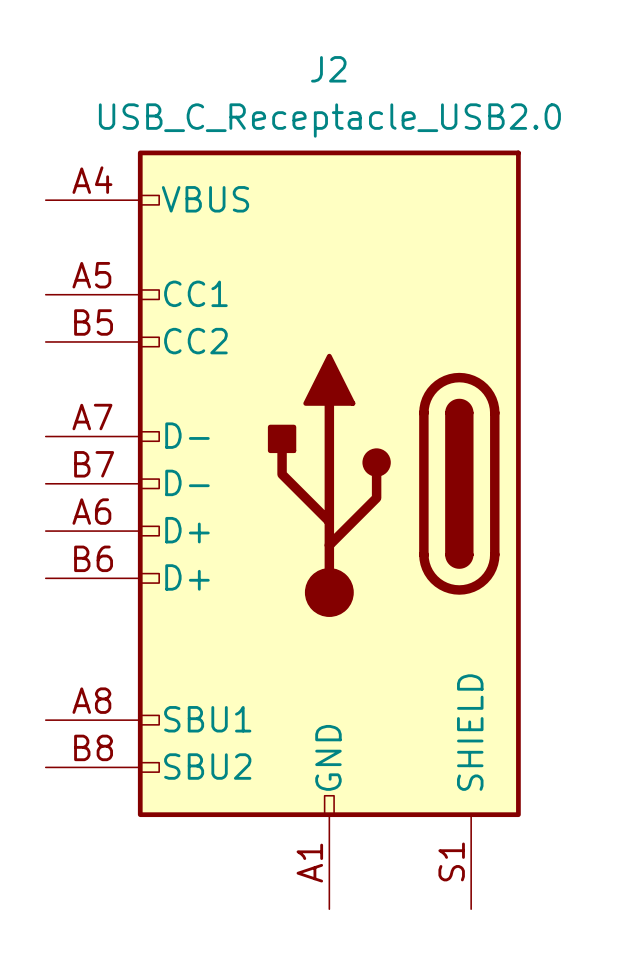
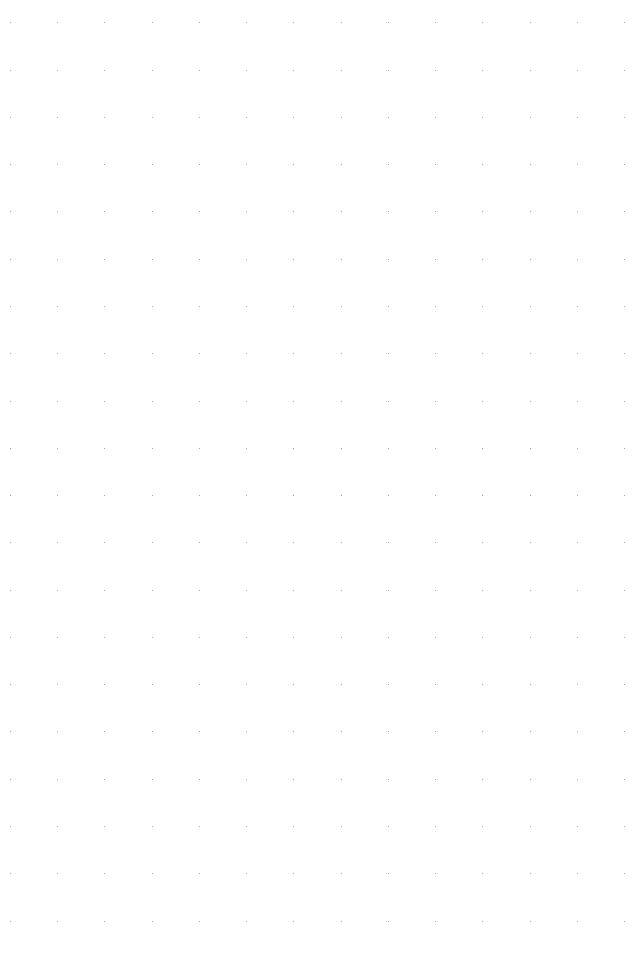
J2: USB_C_Receptacle_USB2.0 (283, 529) -> none

